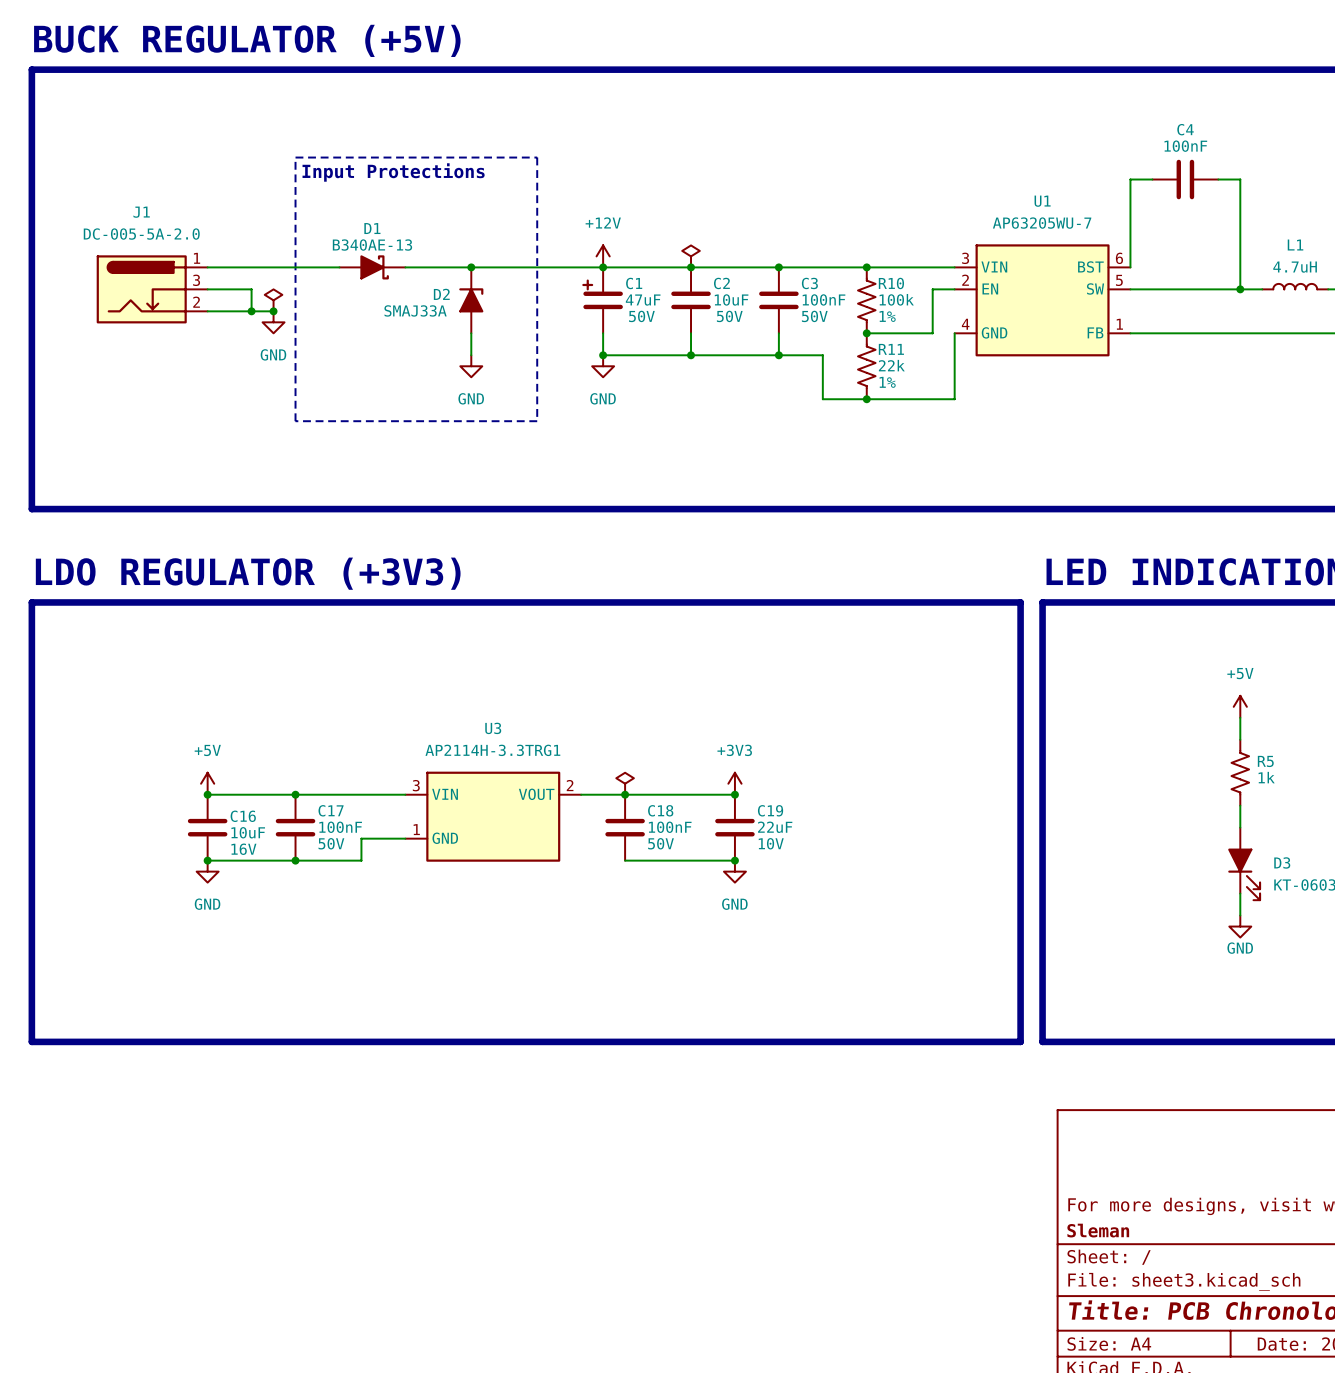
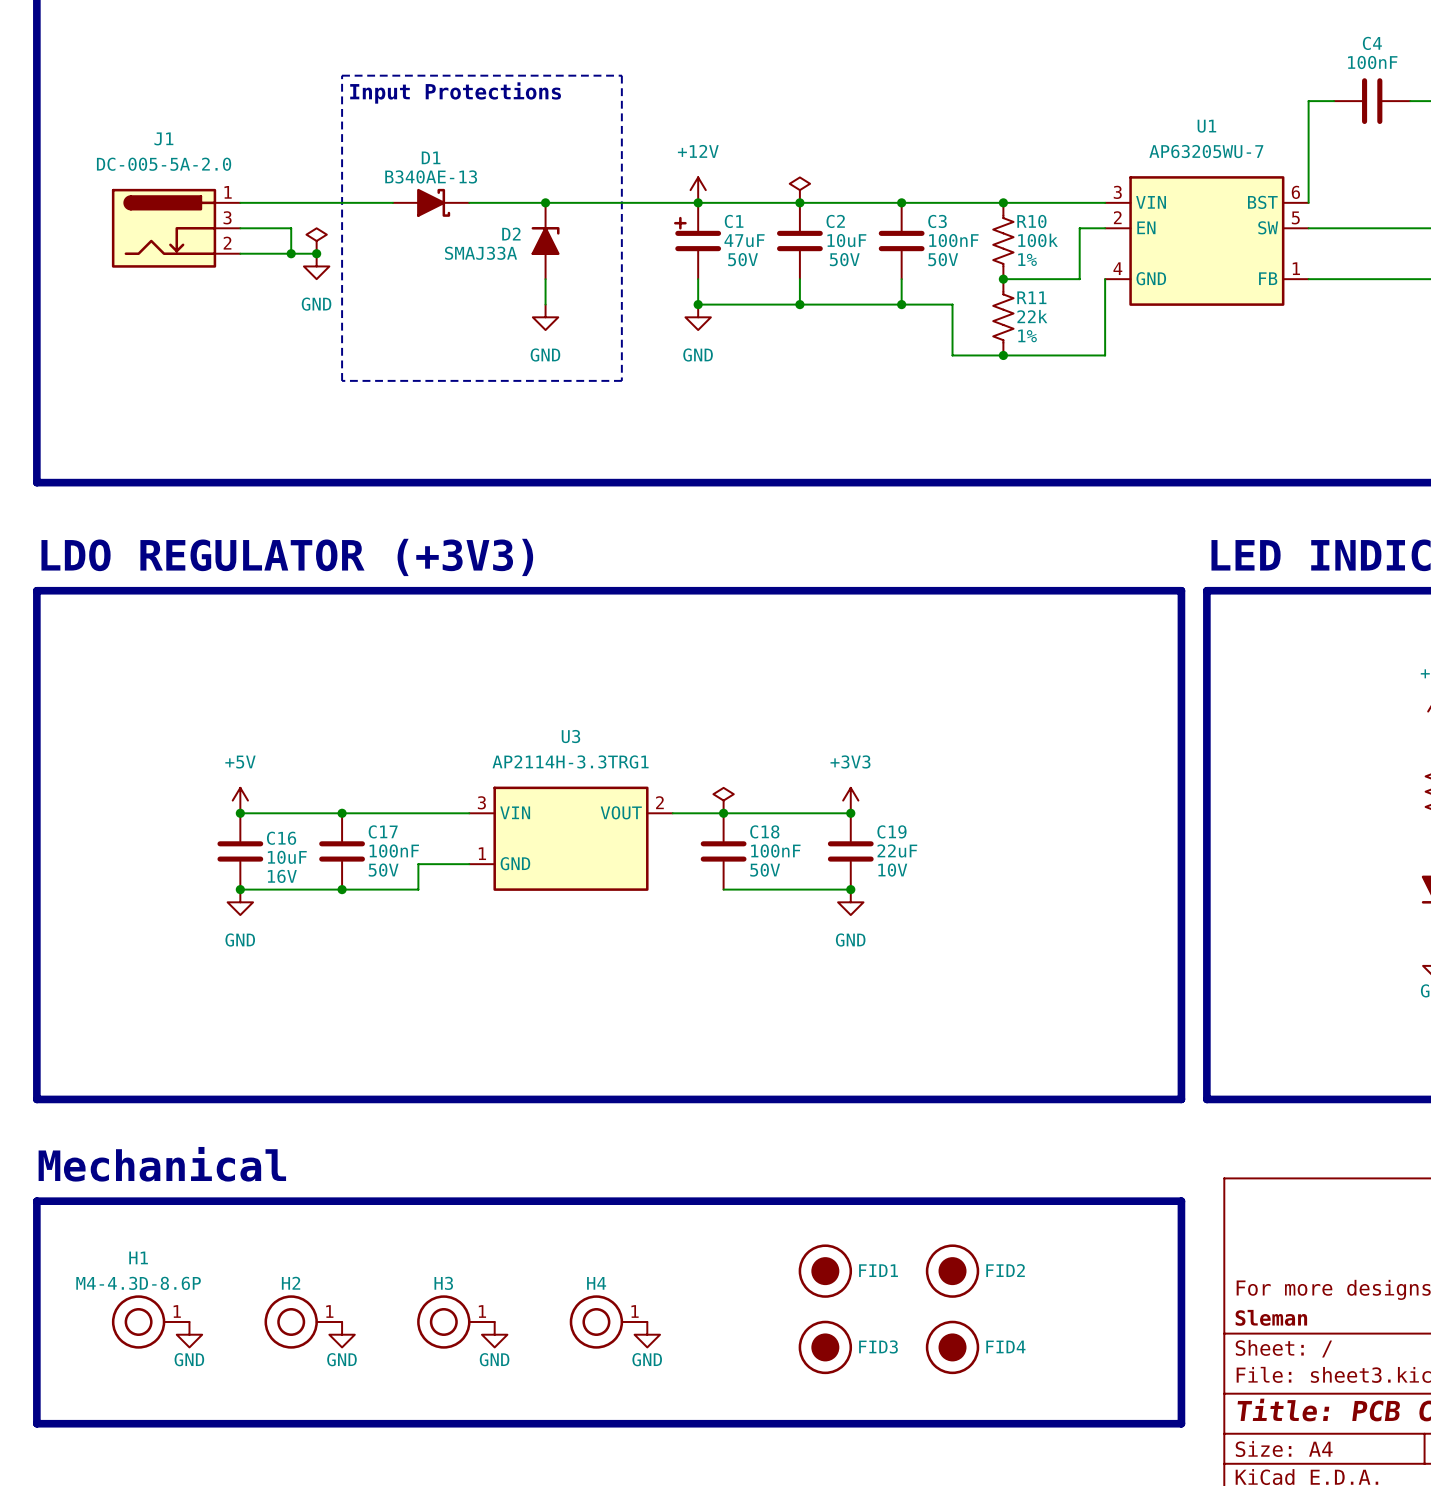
text: none -> Mechanical (162, 1164)
line: none -> (36, 1201) (1181, 1201) (1181, 1423) (36, 1423) (36, 1201)
FID1: none -> (825, 1271)
FID2: none -> (952, 1271)
H1: none -> M4-4.3D-8.6P (150, 1321)
H2: none -> (303, 1321)
H3: none -> (455, 1321)
H4: none -> (608, 1321)
power symbol: none -> GND (189, 1334)
power symbol: none -> GND (342, 1334)
power symbol: none -> GND (494, 1334)
power symbol: none -> GND (647, 1334)
FID3: none -> (825, 1347)
FID4: none -> (952, 1347)

